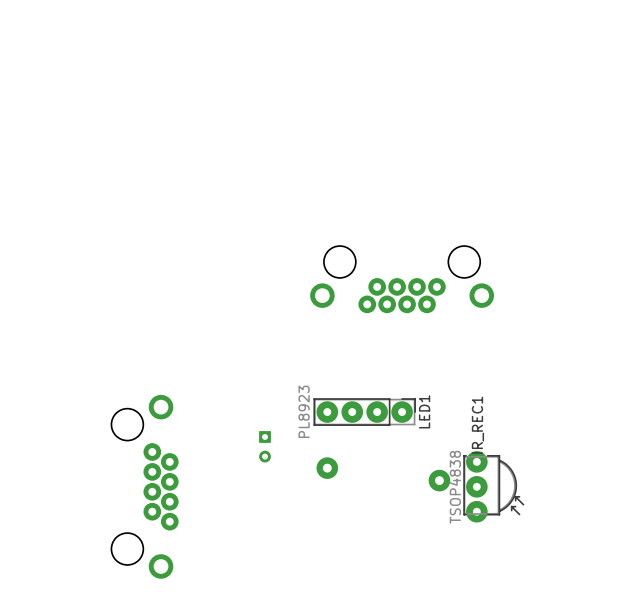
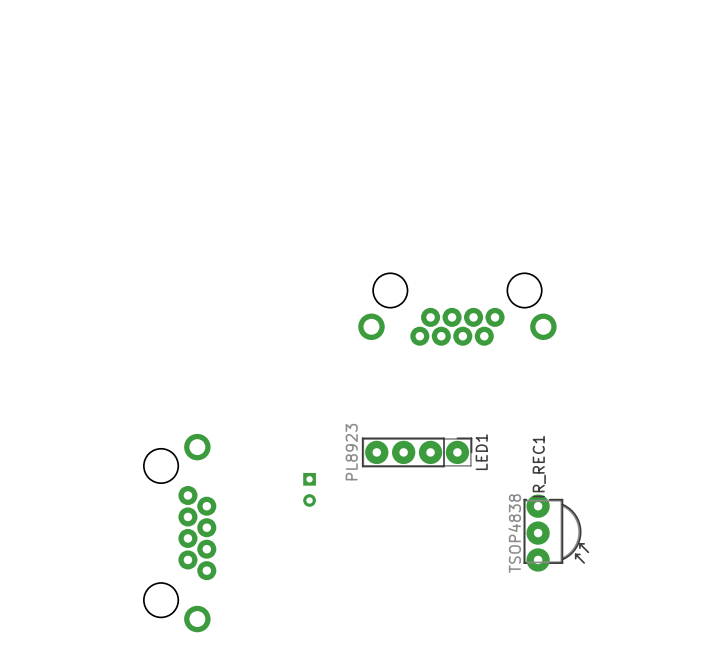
part: (327, 468) -> none
part: (439, 480) -> none

